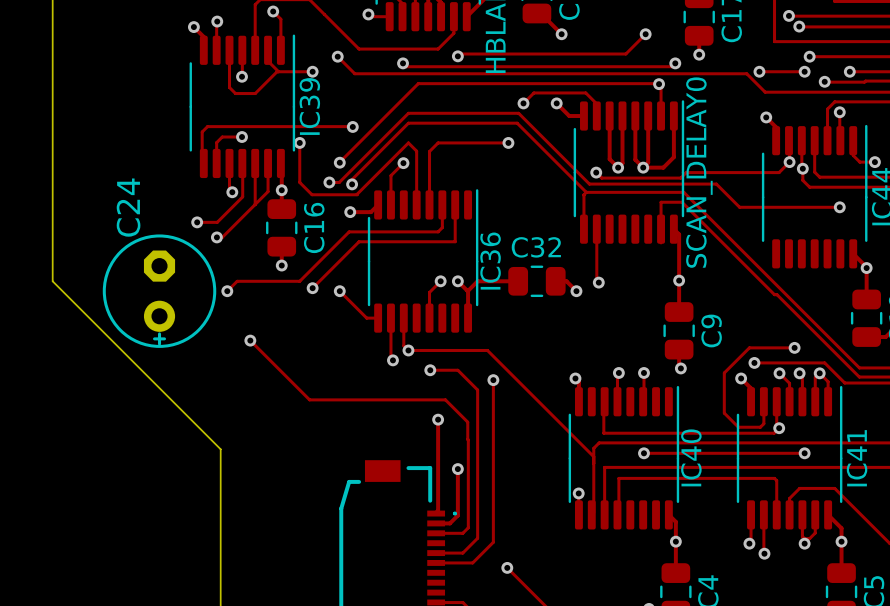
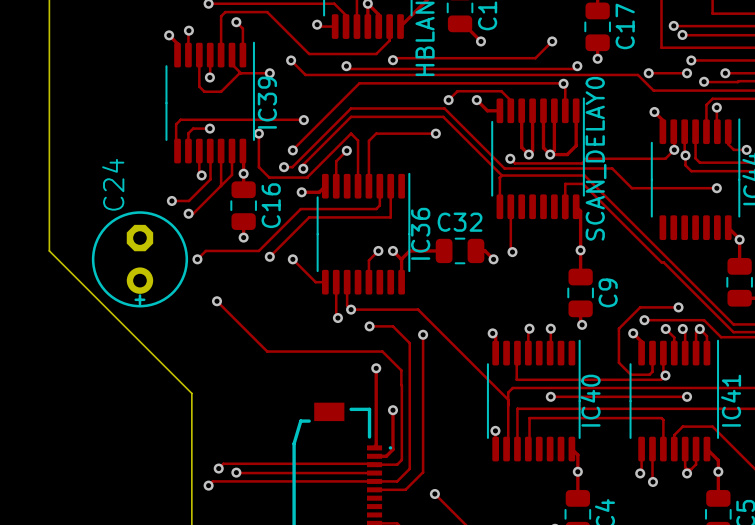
track: none -> (374, 464) (223, 463) (218, 468)
via: none -> (218, 468)
track: none -> (236, 472) (374, 473)
via: none -> (236, 472)
track: none -> (373, 481) (212, 481) (208, 485)
via: none -> (208, 485)

